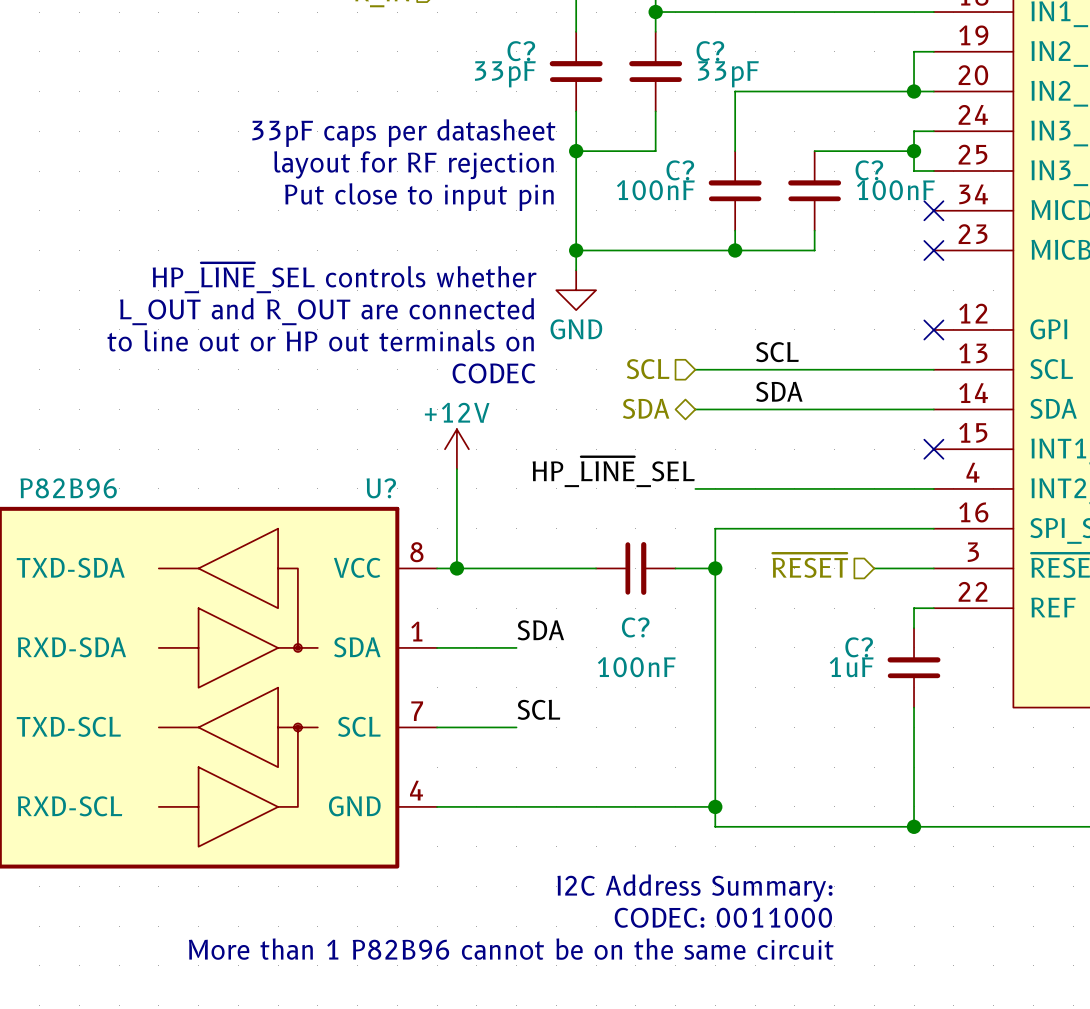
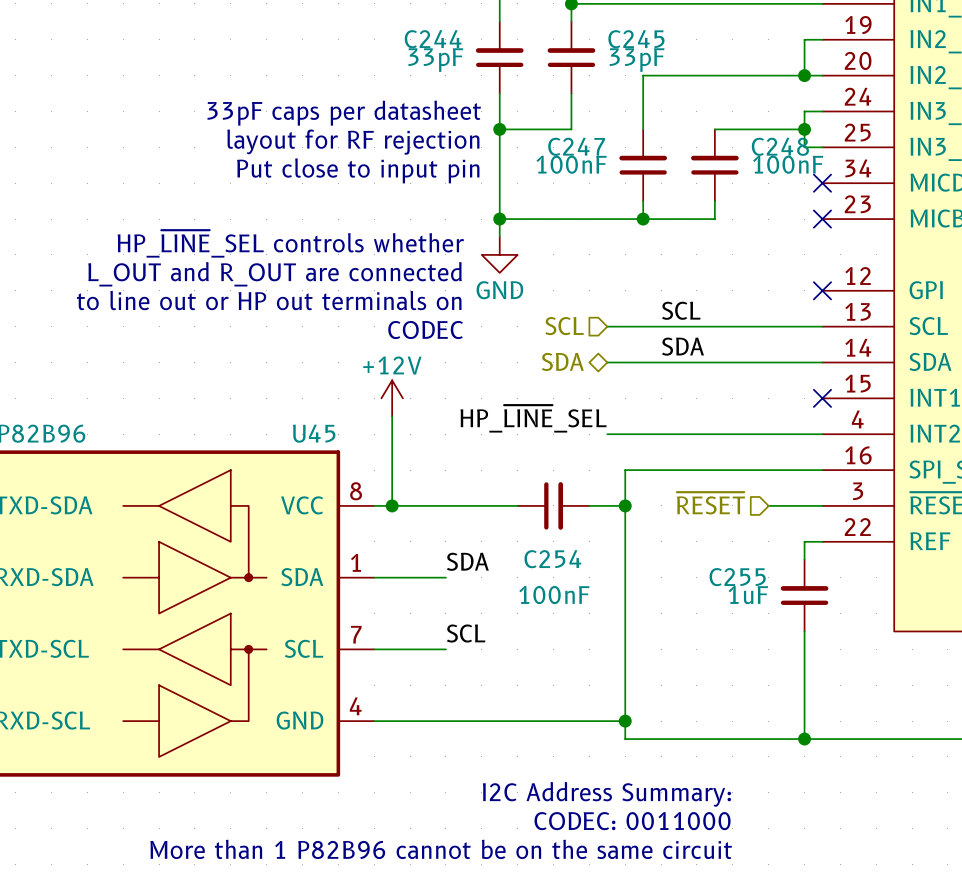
C? name: C? (521, 51) -> C244 (433, 39)
C? name: C? (710, 51) -> C245 (636, 39)
C? name: C? (680, 170) -> C247 (576, 146)
C? name: C? (869, 170) -> C248 (780, 146)
U? name: U? (381, 488) -> U45 (314, 433)
C? name: C? (635, 627) -> C254 (552, 559)
C? name: C? (859, 647) -> C255 (737, 577)

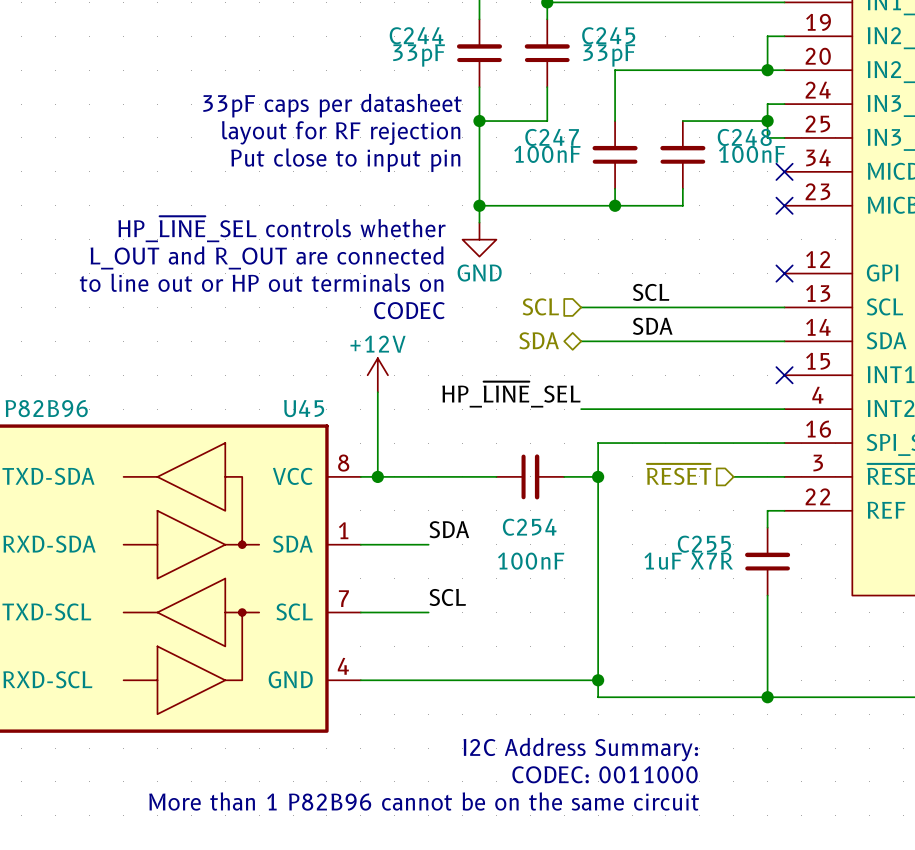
C255 value: 1uF (748, 595) -> 1uF X7R (688, 561)

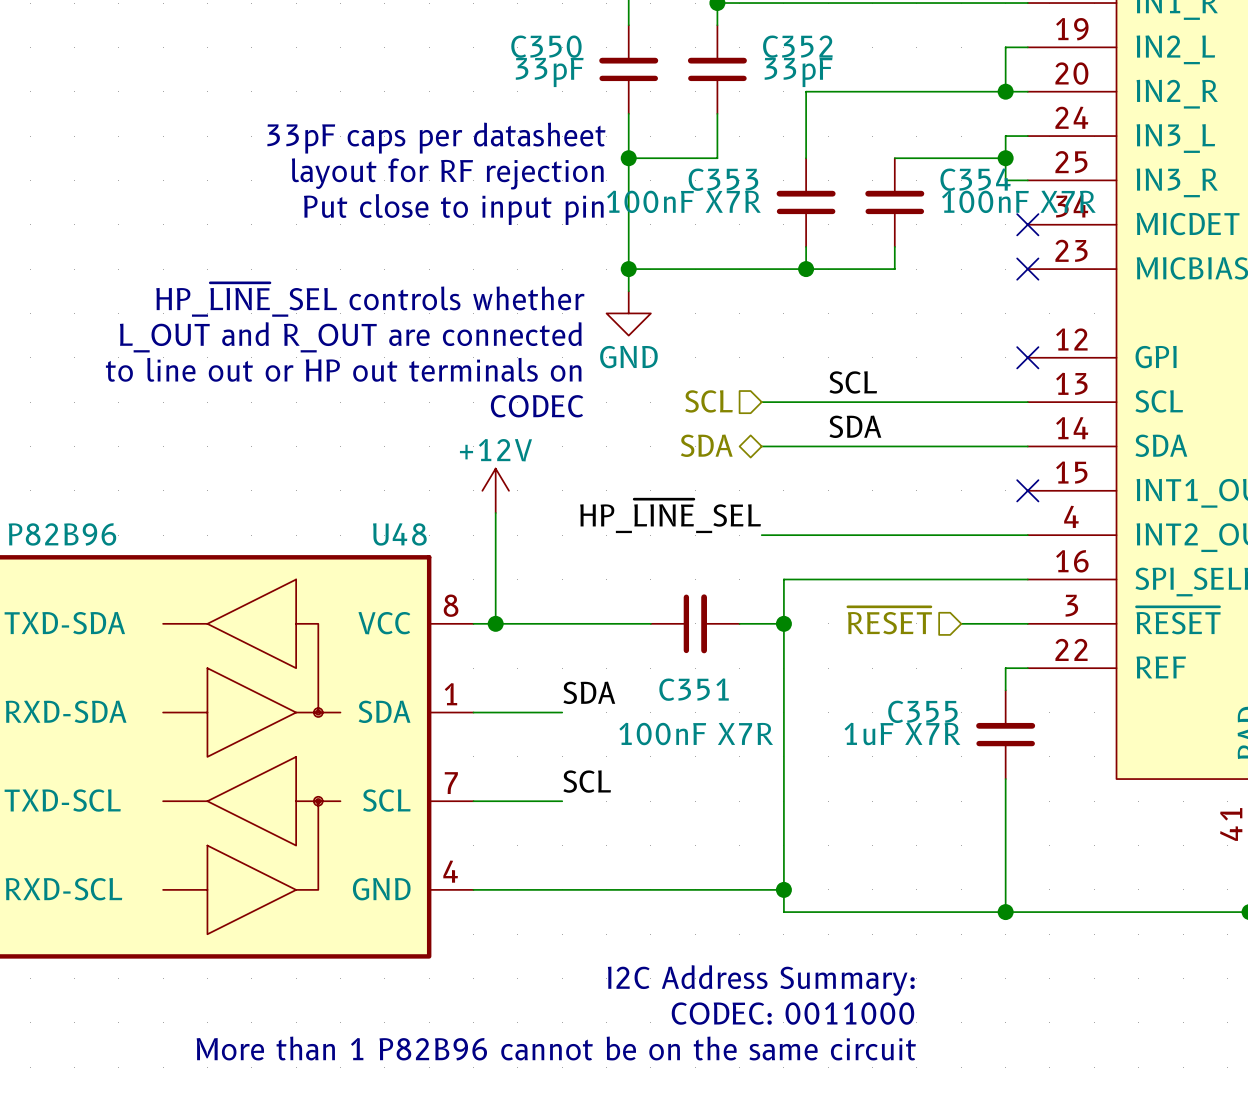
C244 name: C244 (416, 35) -> C350 (546, 46)
C245 name: C245 (608, 35) -> C352 (797, 46)
C247 name: C247 (552, 137) -> C353 (723, 179)
C248 name: C248 (744, 137) -> C354 (975, 179)
C247 value: 100nF (547, 154) -> 100nF X7R (683, 201)
C248 value: 100nF (752, 154) -> 100nF X7R (1018, 201)
U45 name: U45 (304, 408) -> U48 (399, 534)
C254 name: C254 (529, 527) -> C351 (694, 689)
C255 name: C255 (704, 544) -> C355 (922, 711)
C254 value: 100nF (531, 561) -> 100nF X7R (696, 733)

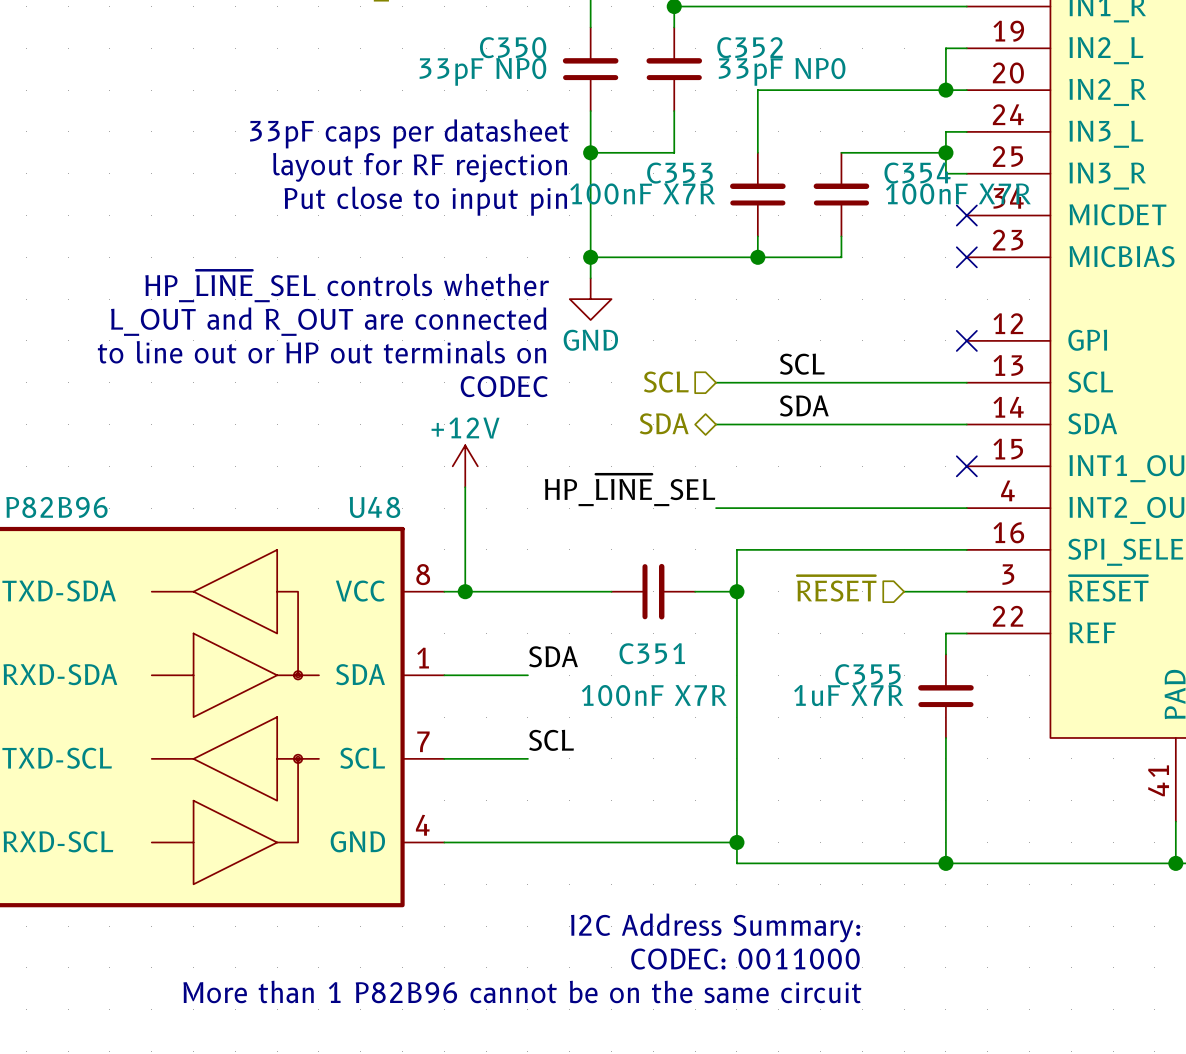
C350 value: 33pF (549, 72) -> 33pF NP0 (482, 71)
C352 value: 33pF (798, 72) -> 33pF NP0 (782, 71)

